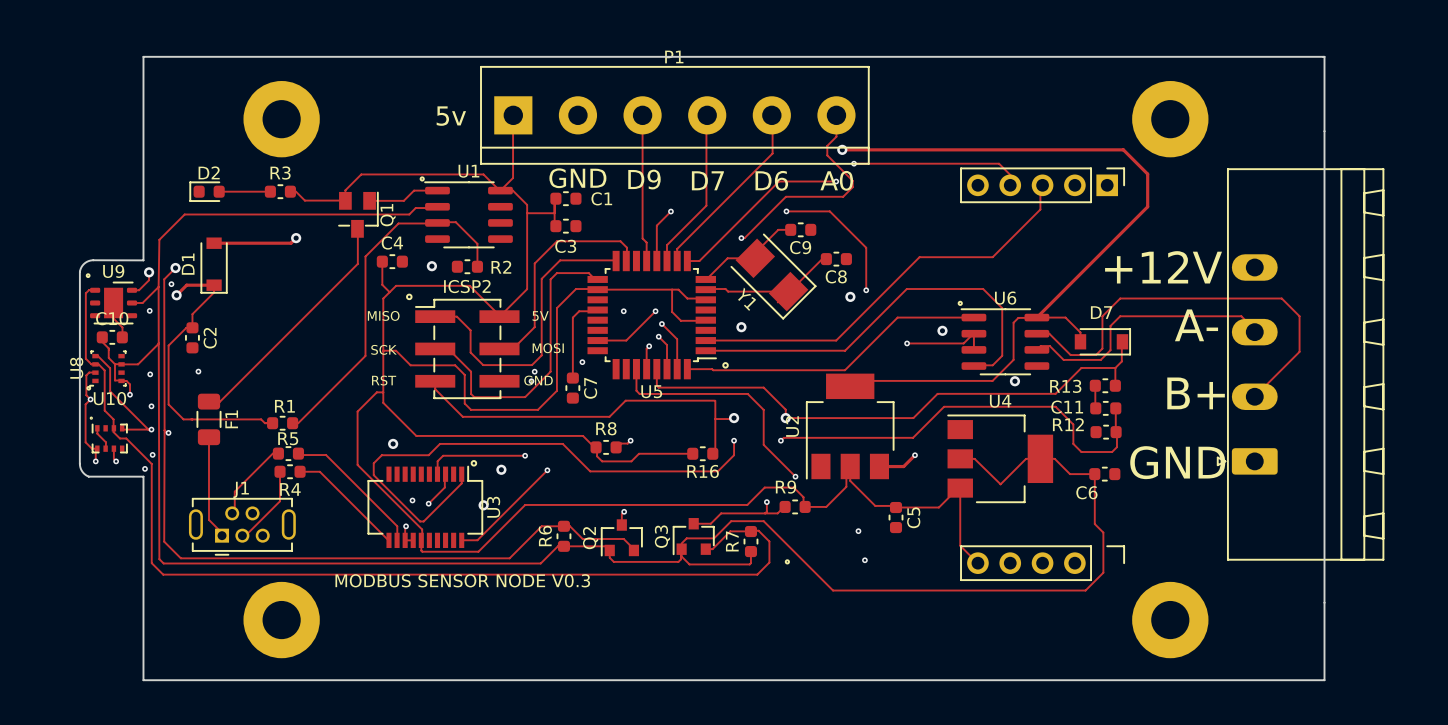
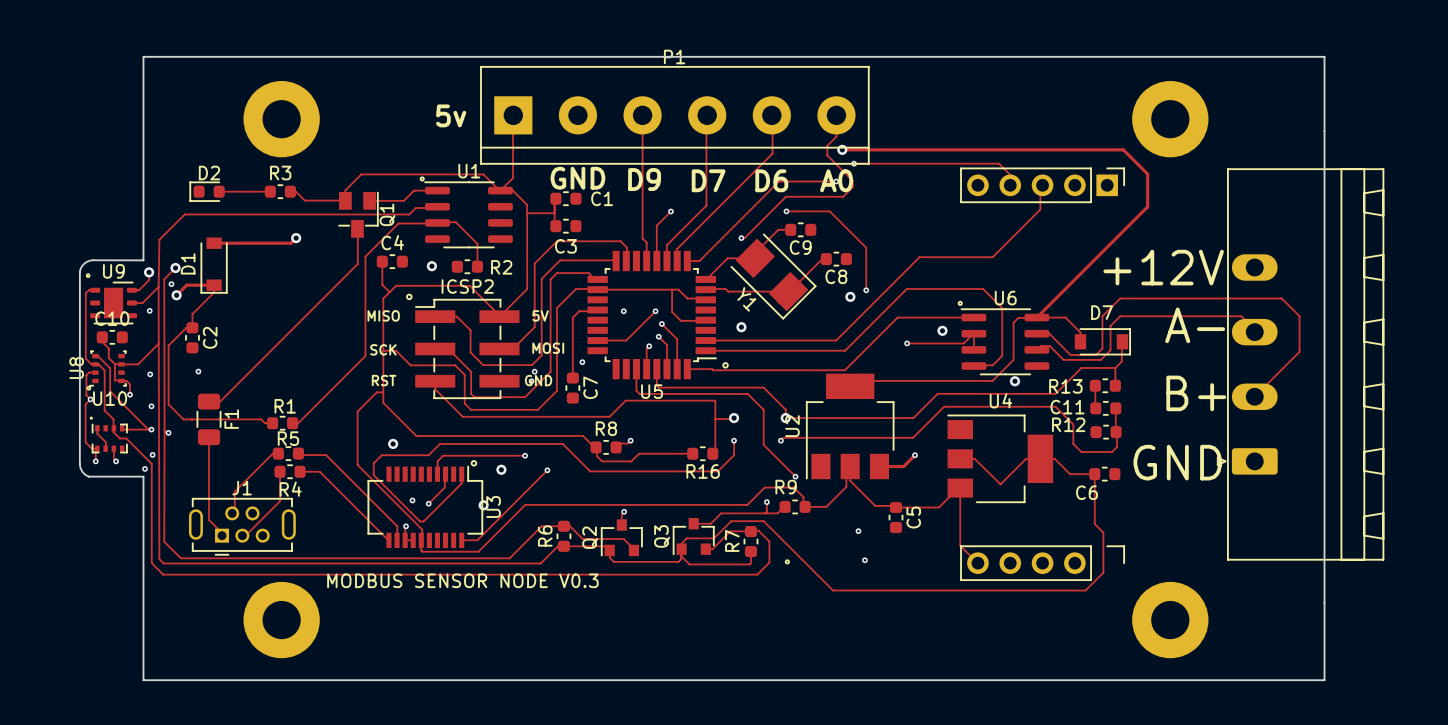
track: (113, 303) (113, 318) (122, 327) (122, 337) -> none

